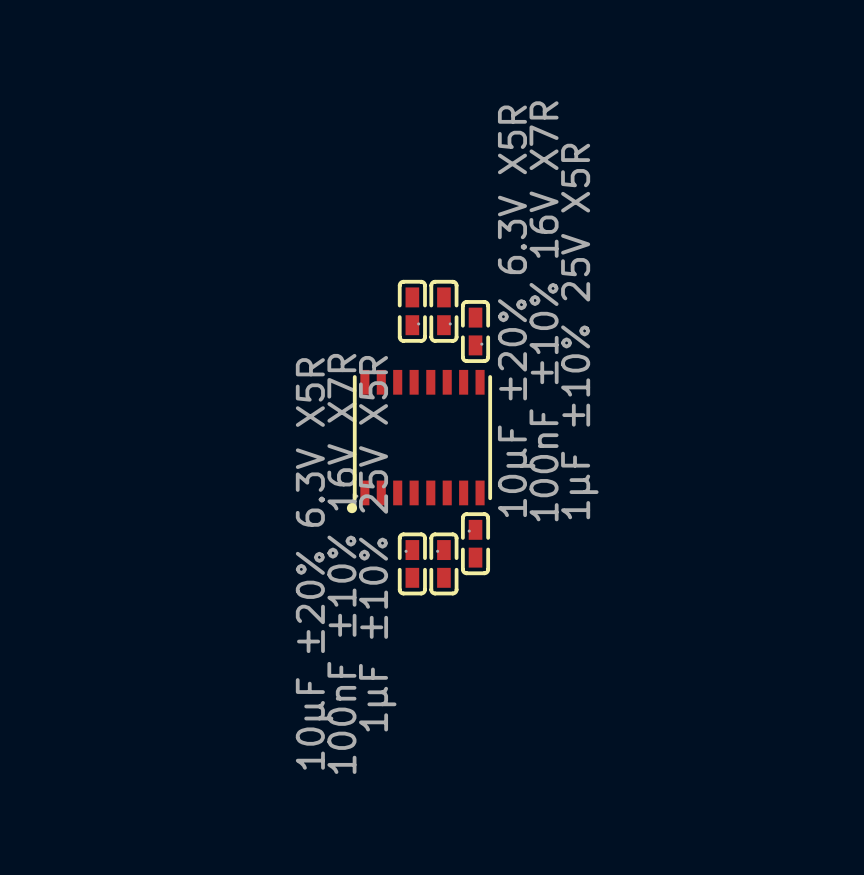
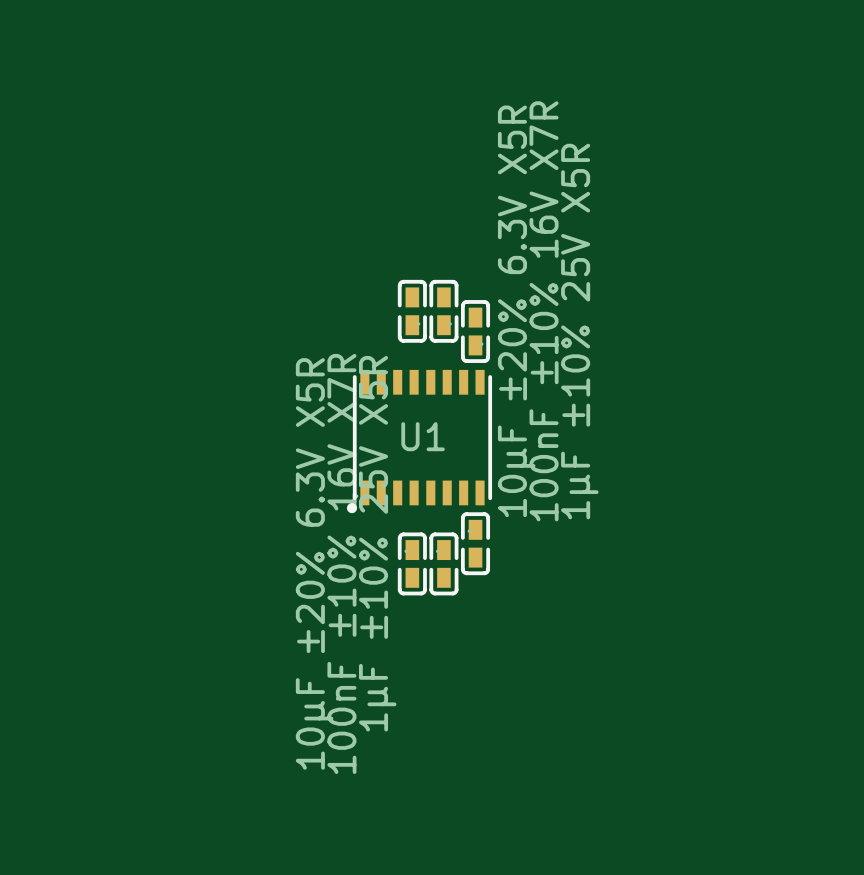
U1 name: none -> U1 (423, 436)

